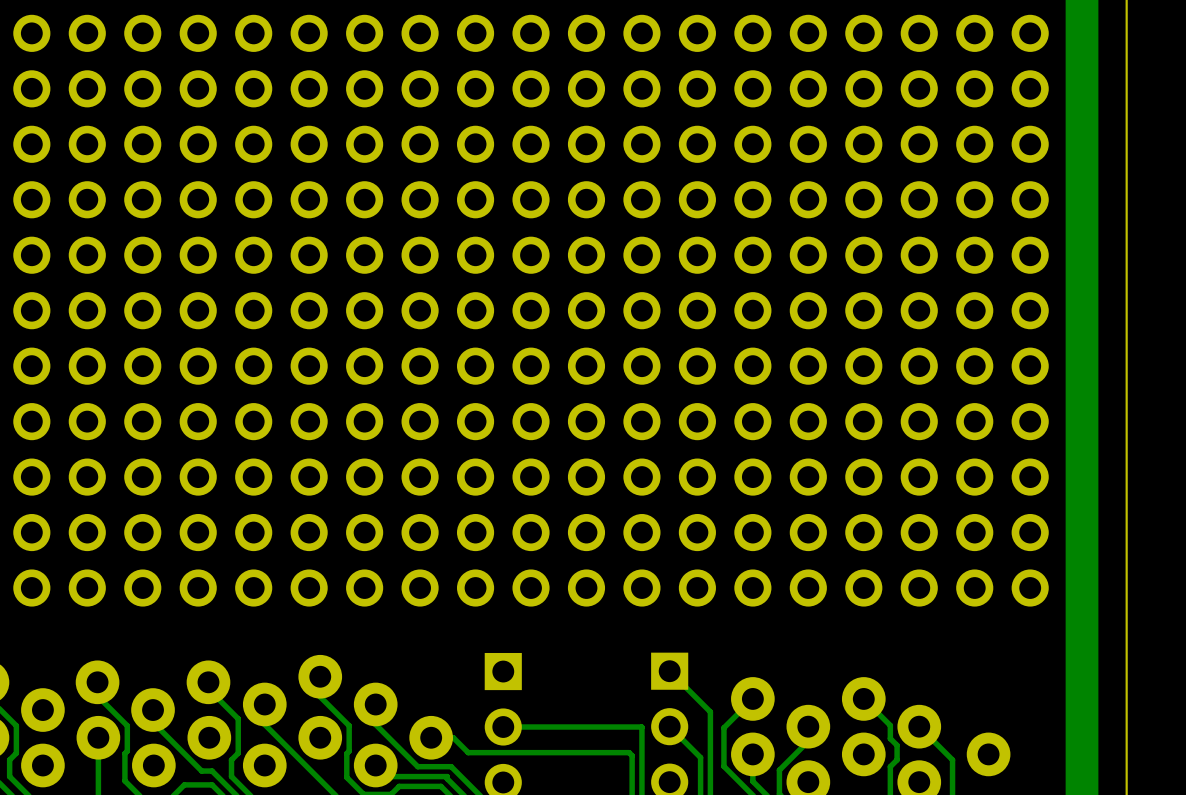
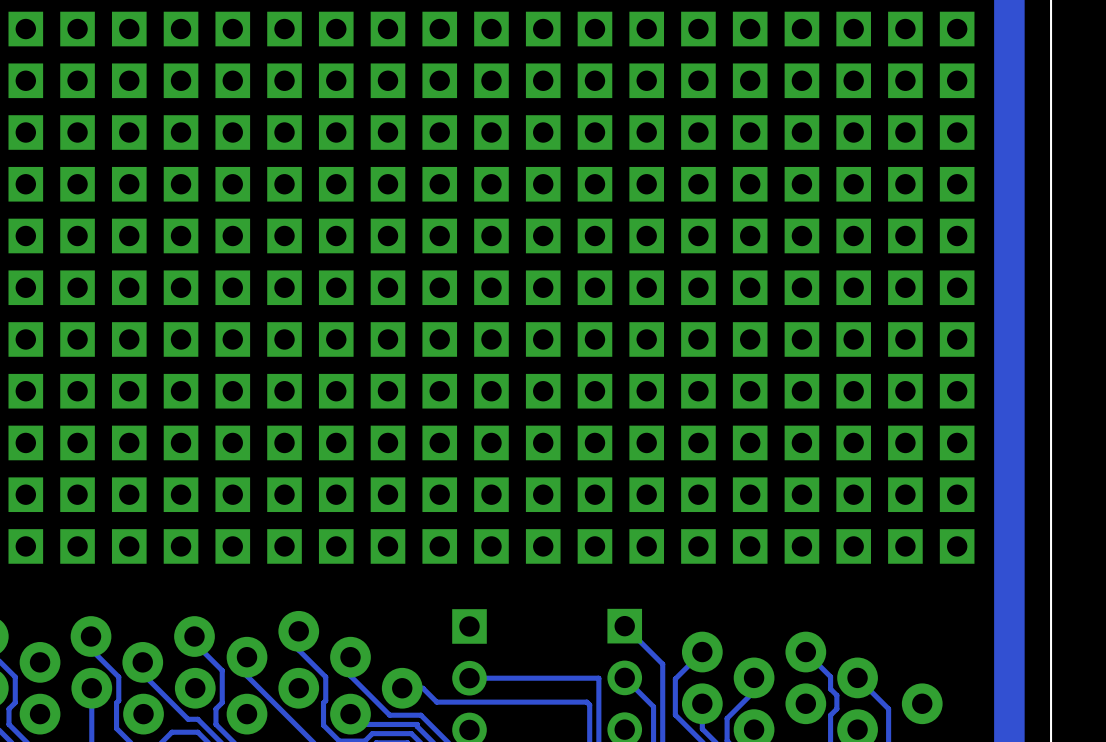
part footprint: [13, 14, 51, 52] -> [8, 11, 44, 47]
part footprint: [68, 14, 106, 52] -> [60, 11, 95, 47]
part footprint: [124, 14, 162, 52] -> [111, 11, 147, 47]
part footprint: [179, 14, 217, 52] -> [163, 11, 199, 47]
part footprint: [235, 14, 273, 52] -> [215, 11, 251, 47]
part footprint: [290, 14, 328, 52] -> [267, 11, 302, 47]
part footprint: [346, 14, 384, 52] -> [318, 11, 354, 47]
part footprint: [401, 14, 439, 52] -> [370, 11, 406, 47]
part footprint: [456, 14, 495, 52] -> [422, 11, 458, 47]
part footprint: [512, 14, 550, 52] -> [474, 11, 509, 47]
part footprint: [567, 14, 606, 52] -> [525, 11, 561, 47]
part footprint: [623, 14, 661, 52] -> [577, 11, 613, 47]
part footprint: [678, 14, 716, 52] -> [629, 11, 665, 47]
part footprint: [734, 14, 772, 52] -> [681, 11, 716, 47]
part footprint: [789, 14, 827, 52] -> [732, 11, 768, 47]
part footprint: [845, 14, 883, 52] -> [784, 11, 820, 47]
part footprint: [900, 14, 938, 52] -> [836, 11, 871, 47]
part footprint: [956, 14, 994, 52] -> [888, 11, 923, 47]
part footprint: [1011, 14, 1049, 52] -> [939, 11, 975, 47]
part footprint: [13, 70, 51, 108] -> [8, 63, 44, 99]
part footprint: [68, 70, 106, 108] -> [60, 63, 95, 99]
part footprint: [124, 70, 162, 108] -> [111, 63, 147, 99]
part footprint: [179, 70, 217, 108] -> [163, 63, 199, 99]
part footprint: [235, 70, 273, 108] -> [215, 63, 251, 99]
part footprint: [290, 70, 328, 108] -> [267, 63, 302, 99]
part footprint: [346, 70, 384, 108] -> [318, 63, 354, 99]
part footprint: [401, 70, 439, 108] -> [370, 63, 406, 99]
part footprint: [456, 70, 495, 108] -> [422, 63, 458, 99]
part footprint: [512, 70, 550, 108] -> [474, 63, 509, 99]
part footprint: [567, 70, 606, 108] -> [525, 63, 561, 99]
part footprint: [623, 70, 661, 108] -> [577, 63, 613, 99]
part footprint: [678, 70, 716, 108] -> [629, 63, 665, 99]
part footprint: [734, 70, 772, 108] -> [681, 63, 716, 99]
part footprint: [789, 70, 827, 108] -> [732, 63, 768, 99]
part footprint: [845, 70, 883, 108] -> [784, 63, 820, 99]
part footprint: [900, 70, 938, 108] -> [836, 63, 871, 99]
part footprint: [956, 70, 994, 108] -> [888, 63, 923, 99]
part footprint: [1011, 70, 1049, 108] -> [939, 63, 975, 99]
part footprint: [13, 125, 51, 163] -> [8, 115, 44, 150]
part footprint: [68, 125, 106, 163] -> [60, 115, 95, 150]
part footprint: [124, 125, 162, 163] -> [111, 115, 147, 150]
part footprint: [179, 125, 217, 163] -> [163, 115, 199, 150]
part footprint: [235, 125, 273, 163] -> [215, 115, 251, 150]
part footprint: [290, 125, 328, 163] -> [267, 115, 302, 150]
part footprint: [346, 125, 384, 163] -> [318, 115, 354, 150]
part footprint: [401, 125, 439, 163] -> [370, 115, 406, 150]
part footprint: [456, 125, 495, 163] -> [422, 115, 458, 150]
part footprint: [512, 125, 550, 163] -> [474, 115, 509, 150]
part footprint: [567, 125, 606, 163] -> [525, 115, 561, 150]
part footprint: [623, 125, 661, 163] -> [577, 115, 613, 150]
part footprint: [678, 125, 716, 163] -> [629, 115, 665, 150]
part footprint: [734, 125, 772, 163] -> [681, 115, 716, 150]
part footprint: [789, 125, 827, 163] -> [732, 115, 768, 150]
part footprint: [845, 125, 883, 163] -> [784, 115, 820, 150]
part footprint: [900, 125, 938, 163] -> [836, 115, 871, 150]
part footprint: [956, 125, 994, 163] -> [888, 115, 923, 150]
part footprint: [1011, 125, 1049, 163] -> [939, 115, 975, 150]
part footprint: [13, 181, 51, 219] -> [8, 166, 44, 202]
part footprint: [68, 181, 106, 219] -> [60, 166, 95, 202]
part footprint: [124, 181, 162, 219] -> [111, 166, 147, 202]
part footprint: [179, 181, 217, 219] -> [163, 166, 199, 202]
part footprint: [235, 181, 273, 219] -> [215, 166, 251, 202]
part footprint: [290, 181, 328, 219] -> [267, 166, 302, 202]
part footprint: [346, 181, 384, 219] -> [318, 166, 354, 202]
part footprint: [401, 181, 439, 219] -> [370, 166, 406, 202]
part footprint: [456, 181, 495, 219] -> [422, 166, 458, 202]
part footprint: [512, 181, 550, 219] -> [474, 166, 509, 202]
part footprint: [567, 181, 606, 219] -> [525, 166, 561, 202]
part footprint: [623, 181, 661, 219] -> [577, 166, 613, 202]
part footprint: [678, 181, 716, 219] -> [629, 166, 665, 202]
part footprint: [734, 181, 772, 219] -> [681, 166, 716, 202]
part footprint: [789, 181, 827, 219] -> [732, 166, 768, 202]
part footprint: [845, 181, 883, 219] -> [784, 166, 820, 202]
part footprint: [900, 181, 938, 219] -> [836, 166, 871, 202]
part footprint: [956, 181, 994, 219] -> [888, 166, 923, 202]
part footprint: [1011, 181, 1049, 219] -> [939, 166, 975, 202]
part footprint: [13, 236, 51, 274] -> [8, 218, 44, 254]
part footprint: [68, 236, 106, 274] -> [60, 218, 95, 254]
part footprint: [124, 236, 162, 274] -> [111, 218, 147, 254]
part footprint: [179, 236, 217, 274] -> [163, 218, 199, 254]
part footprint: [235, 236, 273, 274] -> [215, 218, 251, 254]
part footprint: [290, 236, 328, 274] -> [267, 218, 302, 254]
part footprint: [346, 236, 384, 274] -> [318, 218, 354, 254]
part footprint: [401, 236, 439, 274] -> [370, 218, 406, 254]
part footprint: [456, 236, 495, 274] -> [422, 218, 458, 254]
part footprint: [512, 236, 550, 274] -> [474, 218, 509, 254]
part footprint: [567, 236, 606, 274] -> [525, 218, 561, 254]
part footprint: [623, 236, 661, 274] -> [577, 218, 613, 254]
part footprint: [678, 236, 716, 274] -> [629, 218, 665, 254]
part footprint: [734, 236, 772, 274] -> [681, 218, 716, 254]
part footprint: [789, 236, 827, 274] -> [732, 218, 768, 254]
part footprint: [845, 236, 883, 274] -> [784, 218, 820, 254]
part footprint: [900, 236, 938, 274] -> [836, 218, 871, 254]
part footprint: [956, 236, 994, 274] -> [888, 218, 923, 254]
part footprint: [1011, 236, 1049, 274] -> [939, 218, 975, 254]
part footprint: [13, 292, 51, 330] -> [8, 270, 44, 306]
part footprint: [68, 292, 106, 330] -> [60, 270, 95, 306]
part footprint: [124, 292, 162, 330] -> [111, 270, 147, 306]
part footprint: [179, 292, 217, 330] -> [163, 270, 199, 306]
part footprint: [235, 292, 273, 330] -> [215, 270, 251, 306]
part footprint: [290, 292, 328, 330] -> [267, 270, 302, 306]
part footprint: [346, 292, 384, 330] -> [318, 270, 354, 306]
part footprint: [401, 292, 439, 330] -> [370, 270, 406, 306]
part footprint: [456, 292, 495, 330] -> [422, 270, 458, 306]
part footprint: [512, 292, 550, 330] -> [474, 270, 509, 306]
part footprint: [567, 292, 606, 330] -> [525, 270, 561, 306]
part footprint: [623, 292, 661, 330] -> [577, 270, 613, 306]
part footprint: [678, 292, 716, 330] -> [629, 270, 665, 306]
part footprint: [734, 292, 772, 330] -> [681, 270, 716, 306]
part footprint: [789, 292, 827, 330] -> [732, 270, 768, 306]
part footprint: [845, 292, 883, 330] -> [784, 270, 820, 306]
part footprint: [900, 292, 938, 330] -> [836, 270, 871, 306]
part footprint: [956, 292, 994, 330] -> [888, 270, 923, 306]
part footprint: [1011, 292, 1049, 330] -> [939, 270, 975, 306]
part footprint: [13, 347, 51, 385] -> [8, 322, 44, 357]
part footprint: [68, 347, 106, 385] -> [60, 322, 95, 357]
part footprint: [124, 347, 162, 385] -> [111, 322, 147, 357]
part footprint: [179, 347, 217, 385] -> [163, 322, 199, 357]
part footprint: [235, 347, 273, 385] -> [215, 322, 251, 357]
part footprint: [290, 347, 328, 385] -> [267, 322, 302, 357]
part footprint: [346, 347, 384, 385] -> [318, 322, 354, 357]
part footprint: [401, 347, 439, 385] -> [370, 322, 406, 357]
part footprint: [456, 347, 495, 385] -> [422, 322, 458, 357]
part footprint: [512, 347, 550, 385] -> [474, 322, 509, 357]
part footprint: [567, 347, 606, 385] -> [525, 322, 561, 357]
part footprint: [623, 347, 661, 385] -> [577, 322, 613, 357]
part footprint: [678, 347, 716, 385] -> [629, 322, 665, 357]
part footprint: [734, 347, 772, 385] -> [681, 322, 716, 357]
part footprint: [789, 347, 827, 385] -> [732, 322, 768, 357]
part footprint: [845, 347, 883, 385] -> [784, 322, 820, 357]
part footprint: [900, 347, 938, 385] -> [836, 322, 871, 357]
part footprint: [956, 347, 994, 385] -> [888, 322, 923, 357]
part footprint: [1011, 347, 1049, 385] -> [939, 322, 975, 357]
part footprint: [13, 403, 51, 441] -> [8, 373, 44, 409]
part footprint: [68, 403, 106, 441] -> [60, 373, 95, 409]
part footprint: [124, 403, 162, 441] -> [111, 373, 147, 409]
part footprint: [179, 403, 217, 441] -> [163, 373, 199, 409]
part footprint: [235, 403, 273, 441] -> [215, 373, 251, 409]
part footprint: [290, 403, 328, 441] -> [267, 373, 302, 409]
part footprint: [346, 403, 384, 441] -> [318, 373, 354, 409]
part footprint: [401, 403, 439, 441] -> [370, 373, 406, 409]
part footprint: [456, 403, 495, 441] -> [422, 373, 458, 409]
part footprint: [512, 403, 550, 441] -> [474, 373, 509, 409]
part footprint: [567, 403, 606, 441] -> [525, 373, 561, 409]
part footprint: [623, 403, 661, 441] -> [577, 373, 613, 409]
part footprint: [678, 403, 716, 441] -> [629, 373, 665, 409]
part footprint: [734, 403, 772, 441] -> [681, 373, 716, 409]
part footprint: [789, 403, 827, 441] -> [732, 373, 768, 409]
part footprint: [845, 403, 883, 441] -> [784, 373, 820, 409]
part footprint: [900, 403, 938, 441] -> [836, 373, 871, 409]
part footprint: [956, 403, 994, 441] -> [888, 373, 923, 409]
part footprint: [1011, 403, 1049, 441] -> [939, 373, 975, 409]
part footprint: [13, 458, 51, 496] -> [8, 425, 44, 461]
part footprint: [68, 458, 106, 496] -> [60, 425, 95, 461]
part footprint: [124, 458, 162, 496] -> [111, 425, 147, 461]
part footprint: [179, 458, 217, 496] -> [163, 425, 199, 461]
part footprint: [235, 458, 273, 496] -> [215, 425, 251, 461]
part footprint: [290, 458, 328, 496] -> [267, 425, 302, 461]
part footprint: [346, 458, 384, 496] -> [318, 425, 354, 461]
part footprint: [401, 458, 439, 496] -> [370, 425, 406, 461]
part footprint: [456, 458, 495, 496] -> [422, 425, 458, 461]
part footprint: [512, 458, 550, 496] -> [474, 425, 509, 461]
part footprint: [567, 458, 606, 496] -> [525, 425, 561, 461]
part footprint: [623, 458, 661, 496] -> [577, 425, 613, 461]
part footprint: [678, 458, 716, 496] -> [629, 425, 665, 461]
part footprint: [734, 458, 772, 496] -> [681, 425, 716, 461]
part footprint: [789, 458, 827, 496] -> [732, 425, 768, 461]
part footprint: [845, 458, 883, 496] -> [784, 425, 820, 461]
part footprint: [900, 458, 938, 496] -> [836, 425, 871, 461]
part footprint: [956, 458, 994, 496] -> [888, 425, 923, 461]
part footprint: [1011, 458, 1049, 496] -> [939, 425, 975, 461]
part footprint: [13, 513, 51, 552] -> [8, 477, 44, 513]
part footprint: [68, 513, 106, 552] -> [60, 477, 95, 513]
part footprint: [124, 513, 162, 552] -> [111, 477, 147, 513]
part footprint: [179, 513, 217, 552] -> [163, 477, 199, 513]
part footprint: [235, 513, 273, 552] -> [215, 477, 251, 513]
part footprint: [290, 513, 328, 552] -> [267, 477, 302, 513]
part footprint: [346, 513, 384, 552] -> [318, 477, 354, 513]
part footprint: [401, 513, 439, 552] -> [370, 477, 406, 513]
part footprint: [456, 513, 495, 552] -> [422, 477, 458, 513]
part footprint: [512, 513, 550, 552] -> [474, 477, 509, 513]
part footprint: [567, 513, 606, 552] -> [525, 477, 561, 513]
part footprint: [623, 513, 661, 552] -> [577, 477, 613, 513]
part footprint: [678, 513, 716, 552] -> [629, 477, 665, 513]
part footprint: [734, 513, 772, 552] -> [681, 477, 716, 513]
part footprint: [789, 513, 827, 552] -> [732, 477, 768, 513]
part footprint: [845, 513, 883, 552] -> [784, 477, 820, 513]
part footprint: [900, 513, 938, 552] -> [836, 477, 871, 513]
part footprint: [956, 513, 994, 552] -> [888, 477, 923, 513]
part footprint: [1011, 513, 1049, 552] -> [939, 477, 975, 513]
part footprint: [13, 569, 51, 607] -> [8, 529, 44, 564]
part footprint: [68, 569, 106, 607] -> [60, 529, 95, 564]
part footprint: [124, 569, 162, 607] -> [111, 529, 147, 564]
part footprint: [179, 569, 217, 607] -> [163, 529, 199, 564]
part footprint: [235, 569, 273, 607] -> [215, 529, 251, 564]
part footprint: [290, 569, 328, 607] -> [267, 529, 302, 564]
part footprint: [346, 569, 384, 607] -> [318, 529, 354, 564]
part footprint: [401, 569, 439, 607] -> [370, 529, 406, 564]
part footprint: [456, 569, 495, 607] -> [422, 529, 458, 564]
part footprint: [512, 569, 550, 607] -> [474, 529, 509, 564]
part footprint: [567, 569, 606, 607] -> [525, 529, 561, 564]
part footprint: [623, 569, 661, 607] -> [577, 529, 613, 564]
part footprint: [678, 569, 716, 607] -> [629, 529, 665, 564]
part footprint: [734, 569, 772, 607] -> [681, 529, 716, 564]
part footprint: [789, 569, 827, 607] -> [732, 529, 768, 564]
part footprint: [845, 569, 883, 607] -> [784, 529, 820, 564]
part footprint: [900, 569, 938, 607] -> [836, 529, 871, 564]
part footprint: [956, 569, 994, 607] -> [888, 529, 923, 564]
part footprint: [1011, 569, 1049, 607] -> [939, 529, 975, 564]

